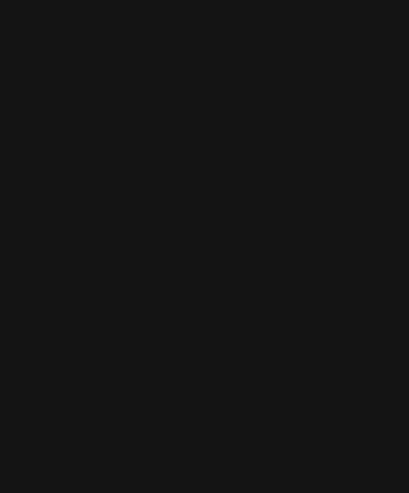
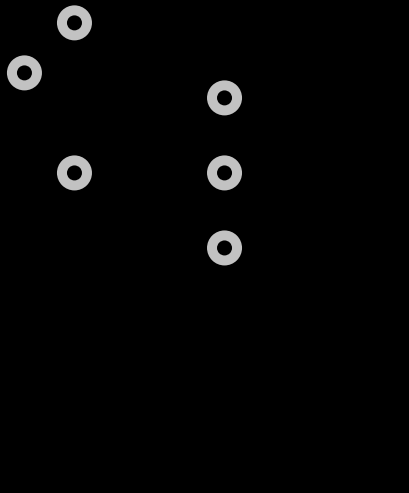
via: none -> (74, 22)
via: none -> (24, 72)
via: none -> (224, 97)
via: none -> (74, 172)
via: none -> (224, 172)
via: none -> (224, 247)

